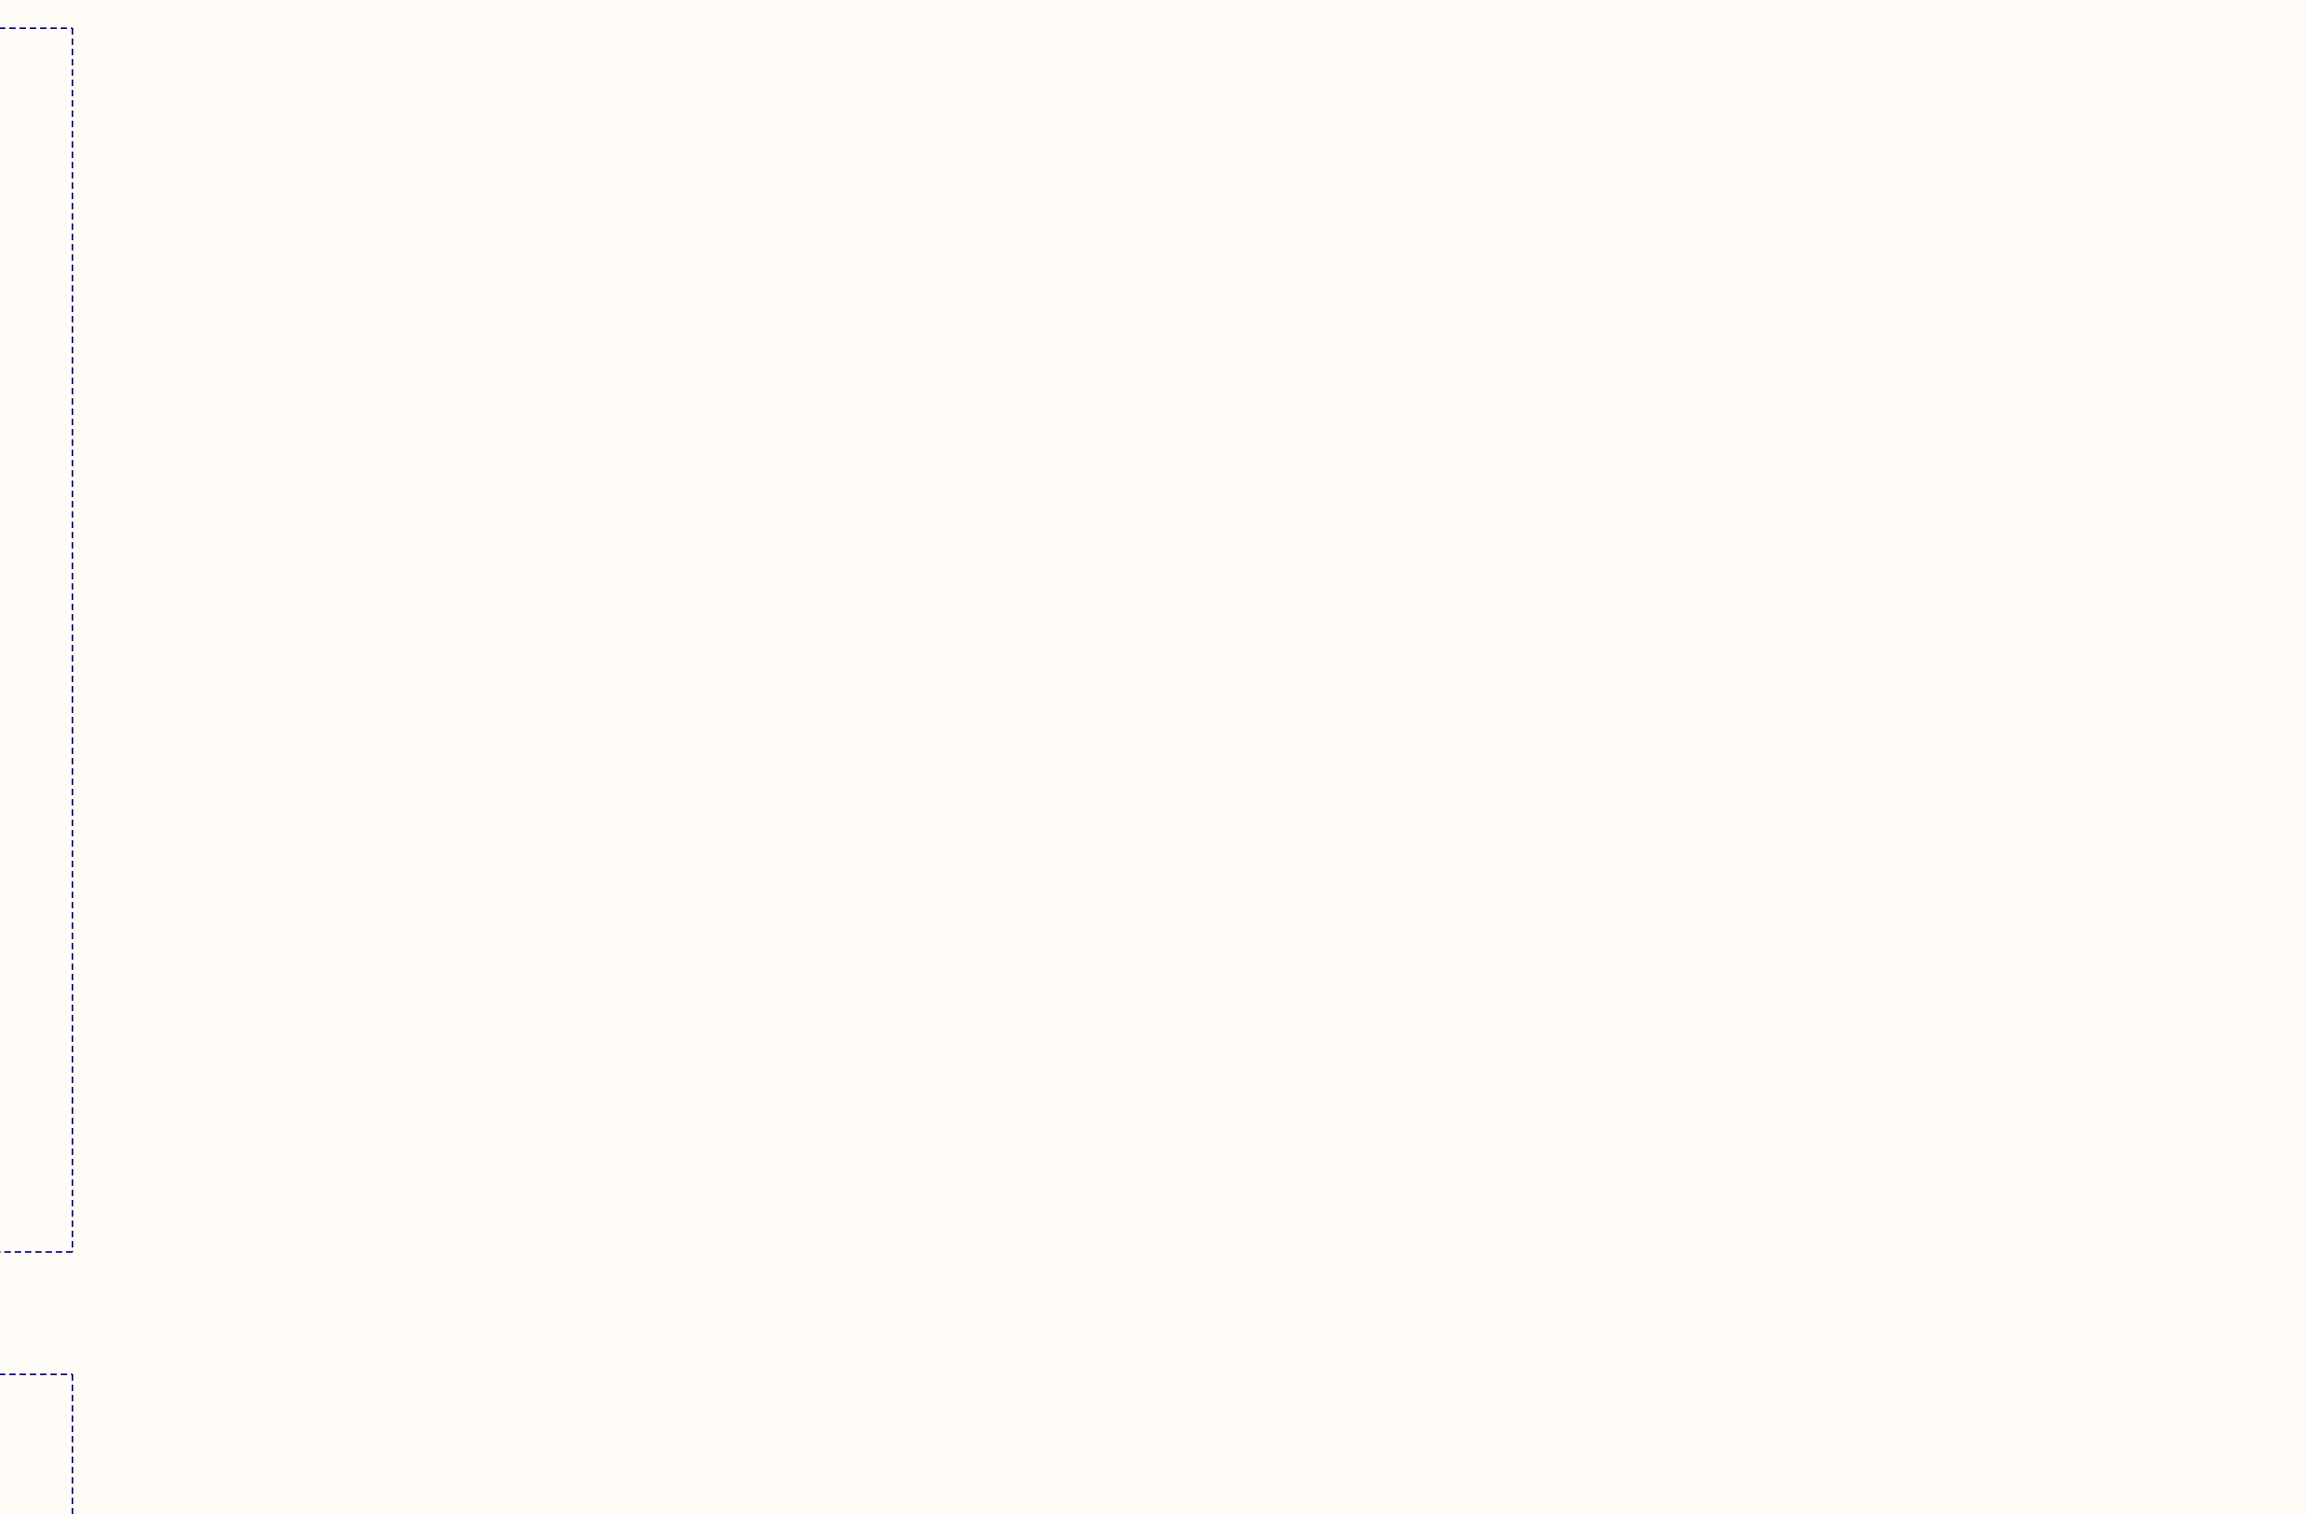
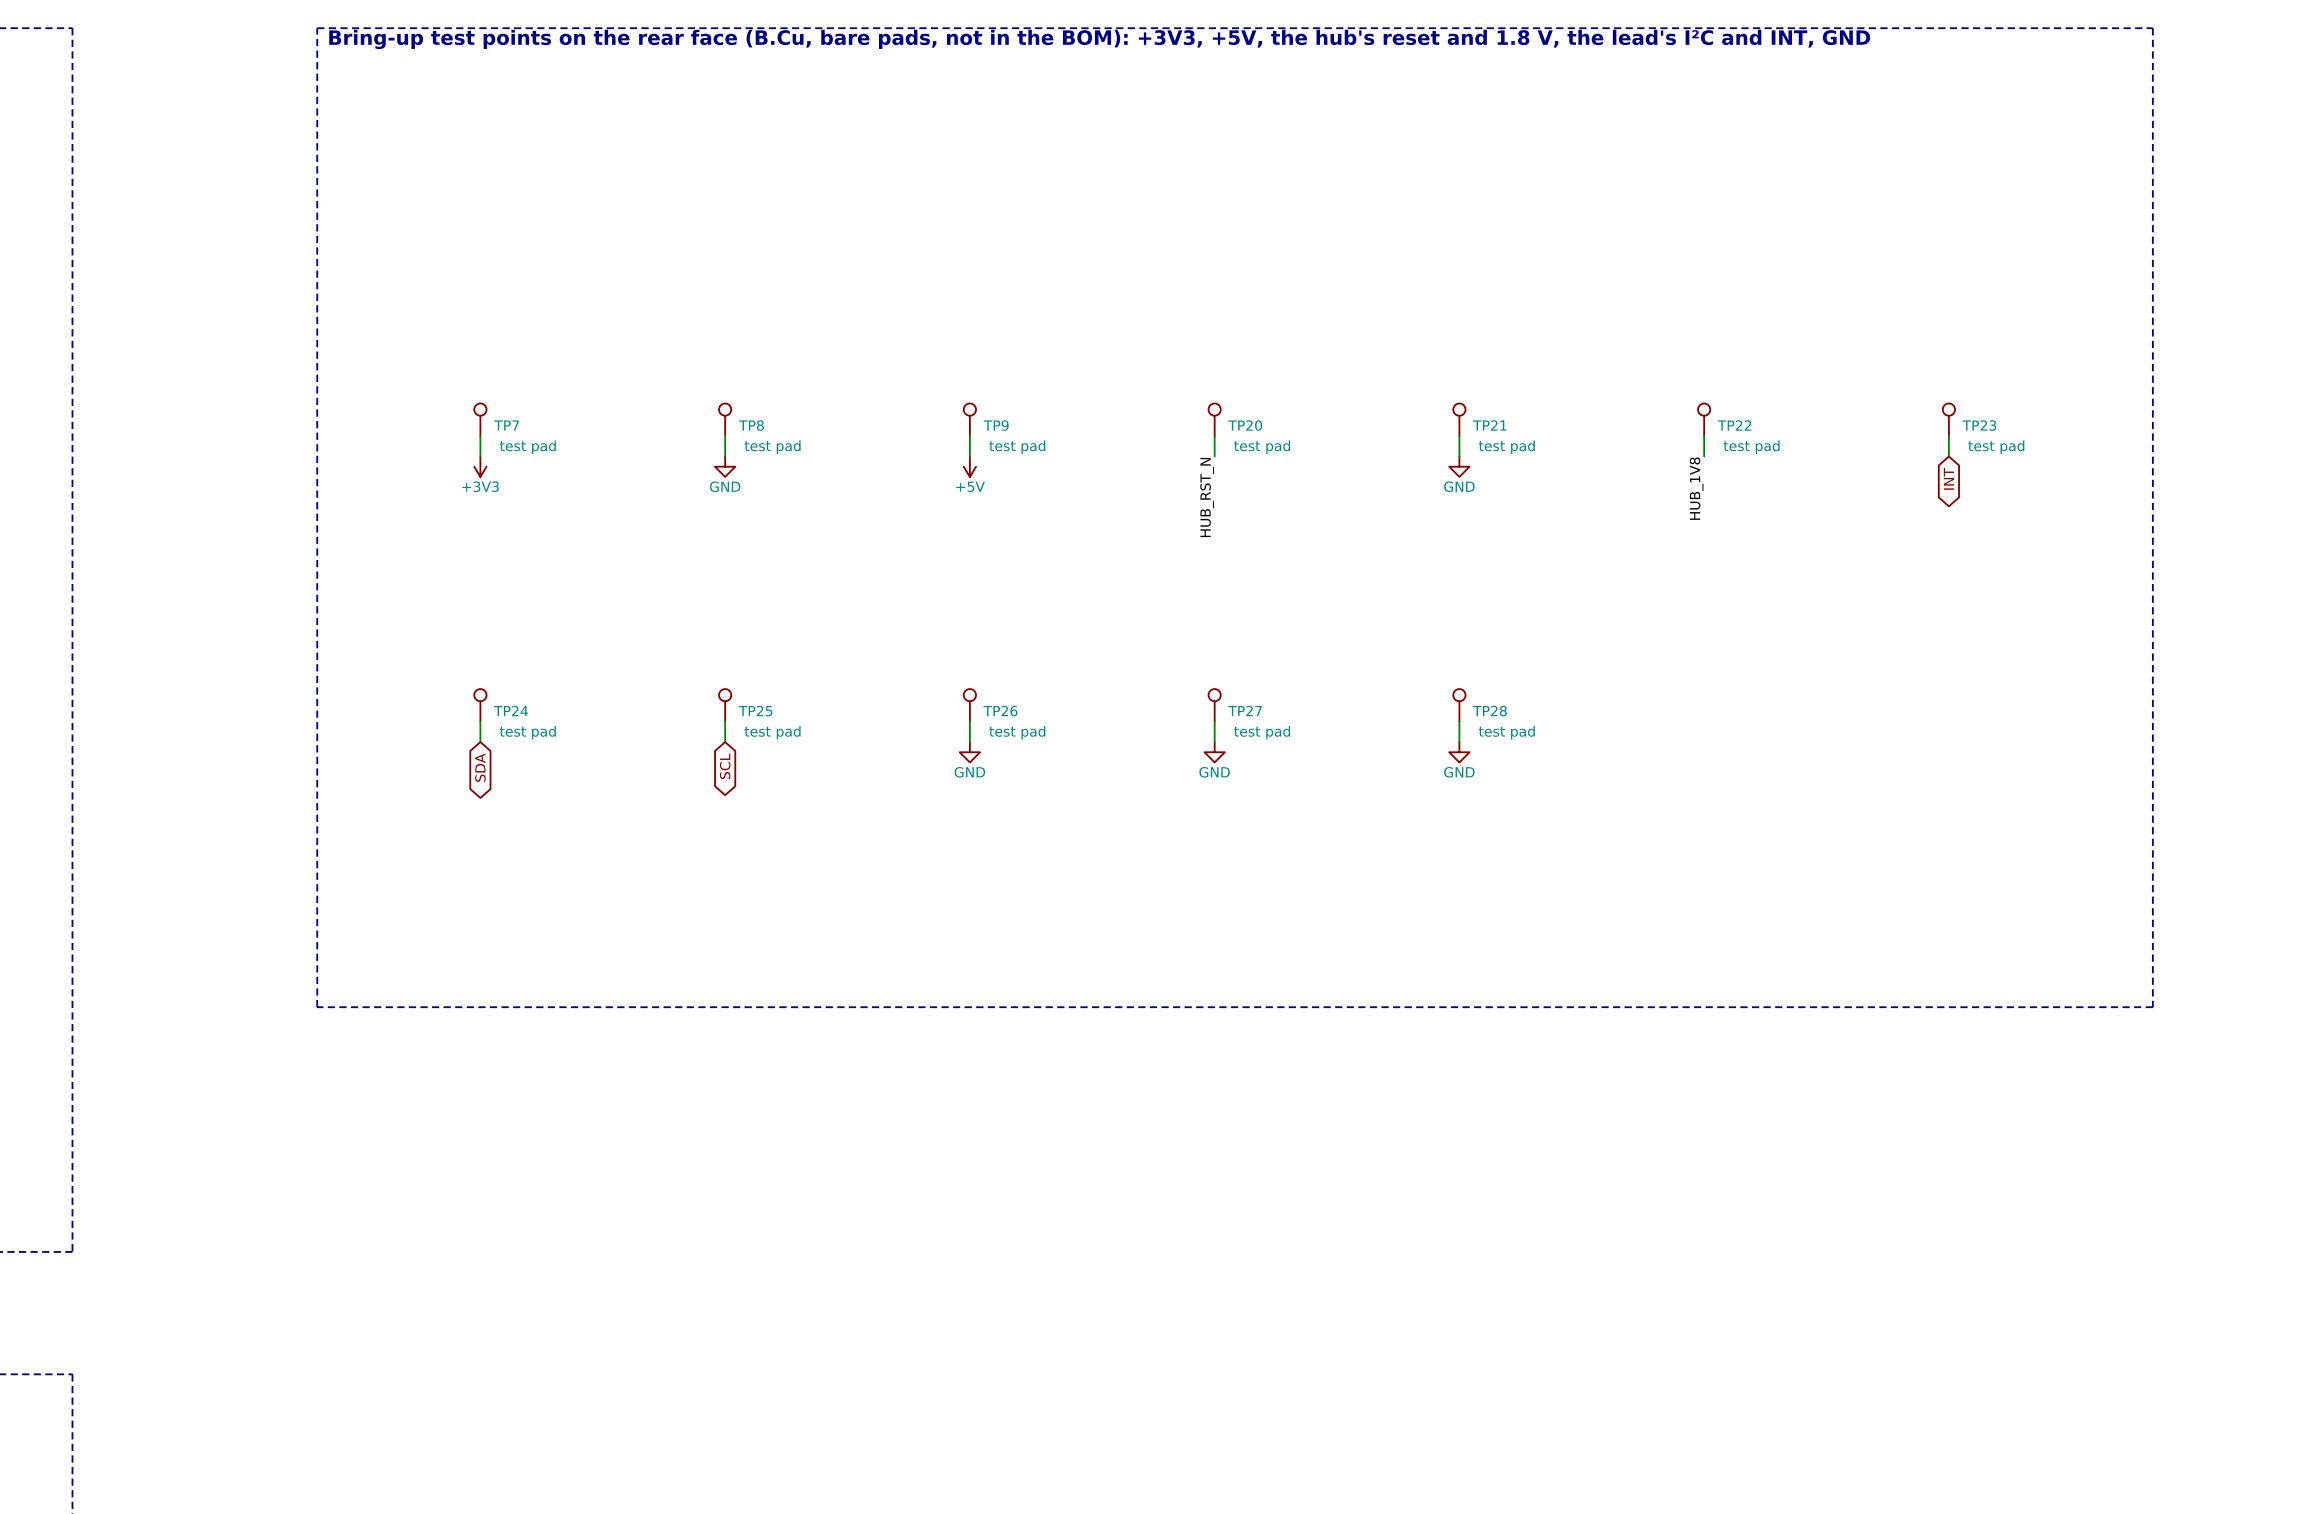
line: none -> (317, 28) (2152, 28) (2152, 1007) (317, 1007) (317, 28)
text: none -> Bring-up test points on the rear face (B.Cu, bare pads, not in the BOM): +3V3, +5V, the hub's reset and 1.8 V, the lead's I²C and INT, GND (1099, 39)
TP7: none -> test pad (480, 419)
TP8: none -> test pad (725, 419)
TP9: none -> test pad (969, 419)
TP20: none -> test pad (1214, 419)
TP21: none -> test pad (1459, 419)
TP22: none -> test pad (1704, 419)
TP23: none -> test pad (1948, 419)
wire: none -> (480, 436) (480, 456)
wire: none -> (725, 436) (725, 456)
wire: none -> (969, 436) (969, 456)
wire: none -> (1214, 436) (1214, 456)
wire: none -> (1459, 436) (1459, 456)
wire: none -> (1704, 436) (1704, 456)
wire: none -> (1948, 436) (1948, 456)
power symbol: none -> +3V3 (480, 466)
power symbol: none -> GND (725, 466)
power symbol: none -> +5V (969, 466)
power symbol: none -> GND (1459, 466)
global label: none -> INT (1948, 478)
label: none -> HUB_1V8 (1696, 488)
label: none -> HUB_RST_N (1207, 497)
TP24: none -> test pad (480, 705)
TP25: none -> test pad (725, 705)
TP26: none -> test pad (969, 705)
TP27: none -> test pad (1214, 705)
TP28: none -> test pad (1459, 705)
wire: none -> (480, 721) (480, 742)
wire: none -> (725, 721) (725, 742)
wire: none -> (969, 721) (969, 742)
wire: none -> (1214, 721) (1214, 742)
wire: none -> (1459, 721) (1459, 742)
power symbol: none -> GND (969, 752)
power symbol: none -> GND (1214, 752)
power symbol: none -> GND (1459, 752)
global label: none -> SCL (725, 766)
global label: none -> SDA (480, 767)

